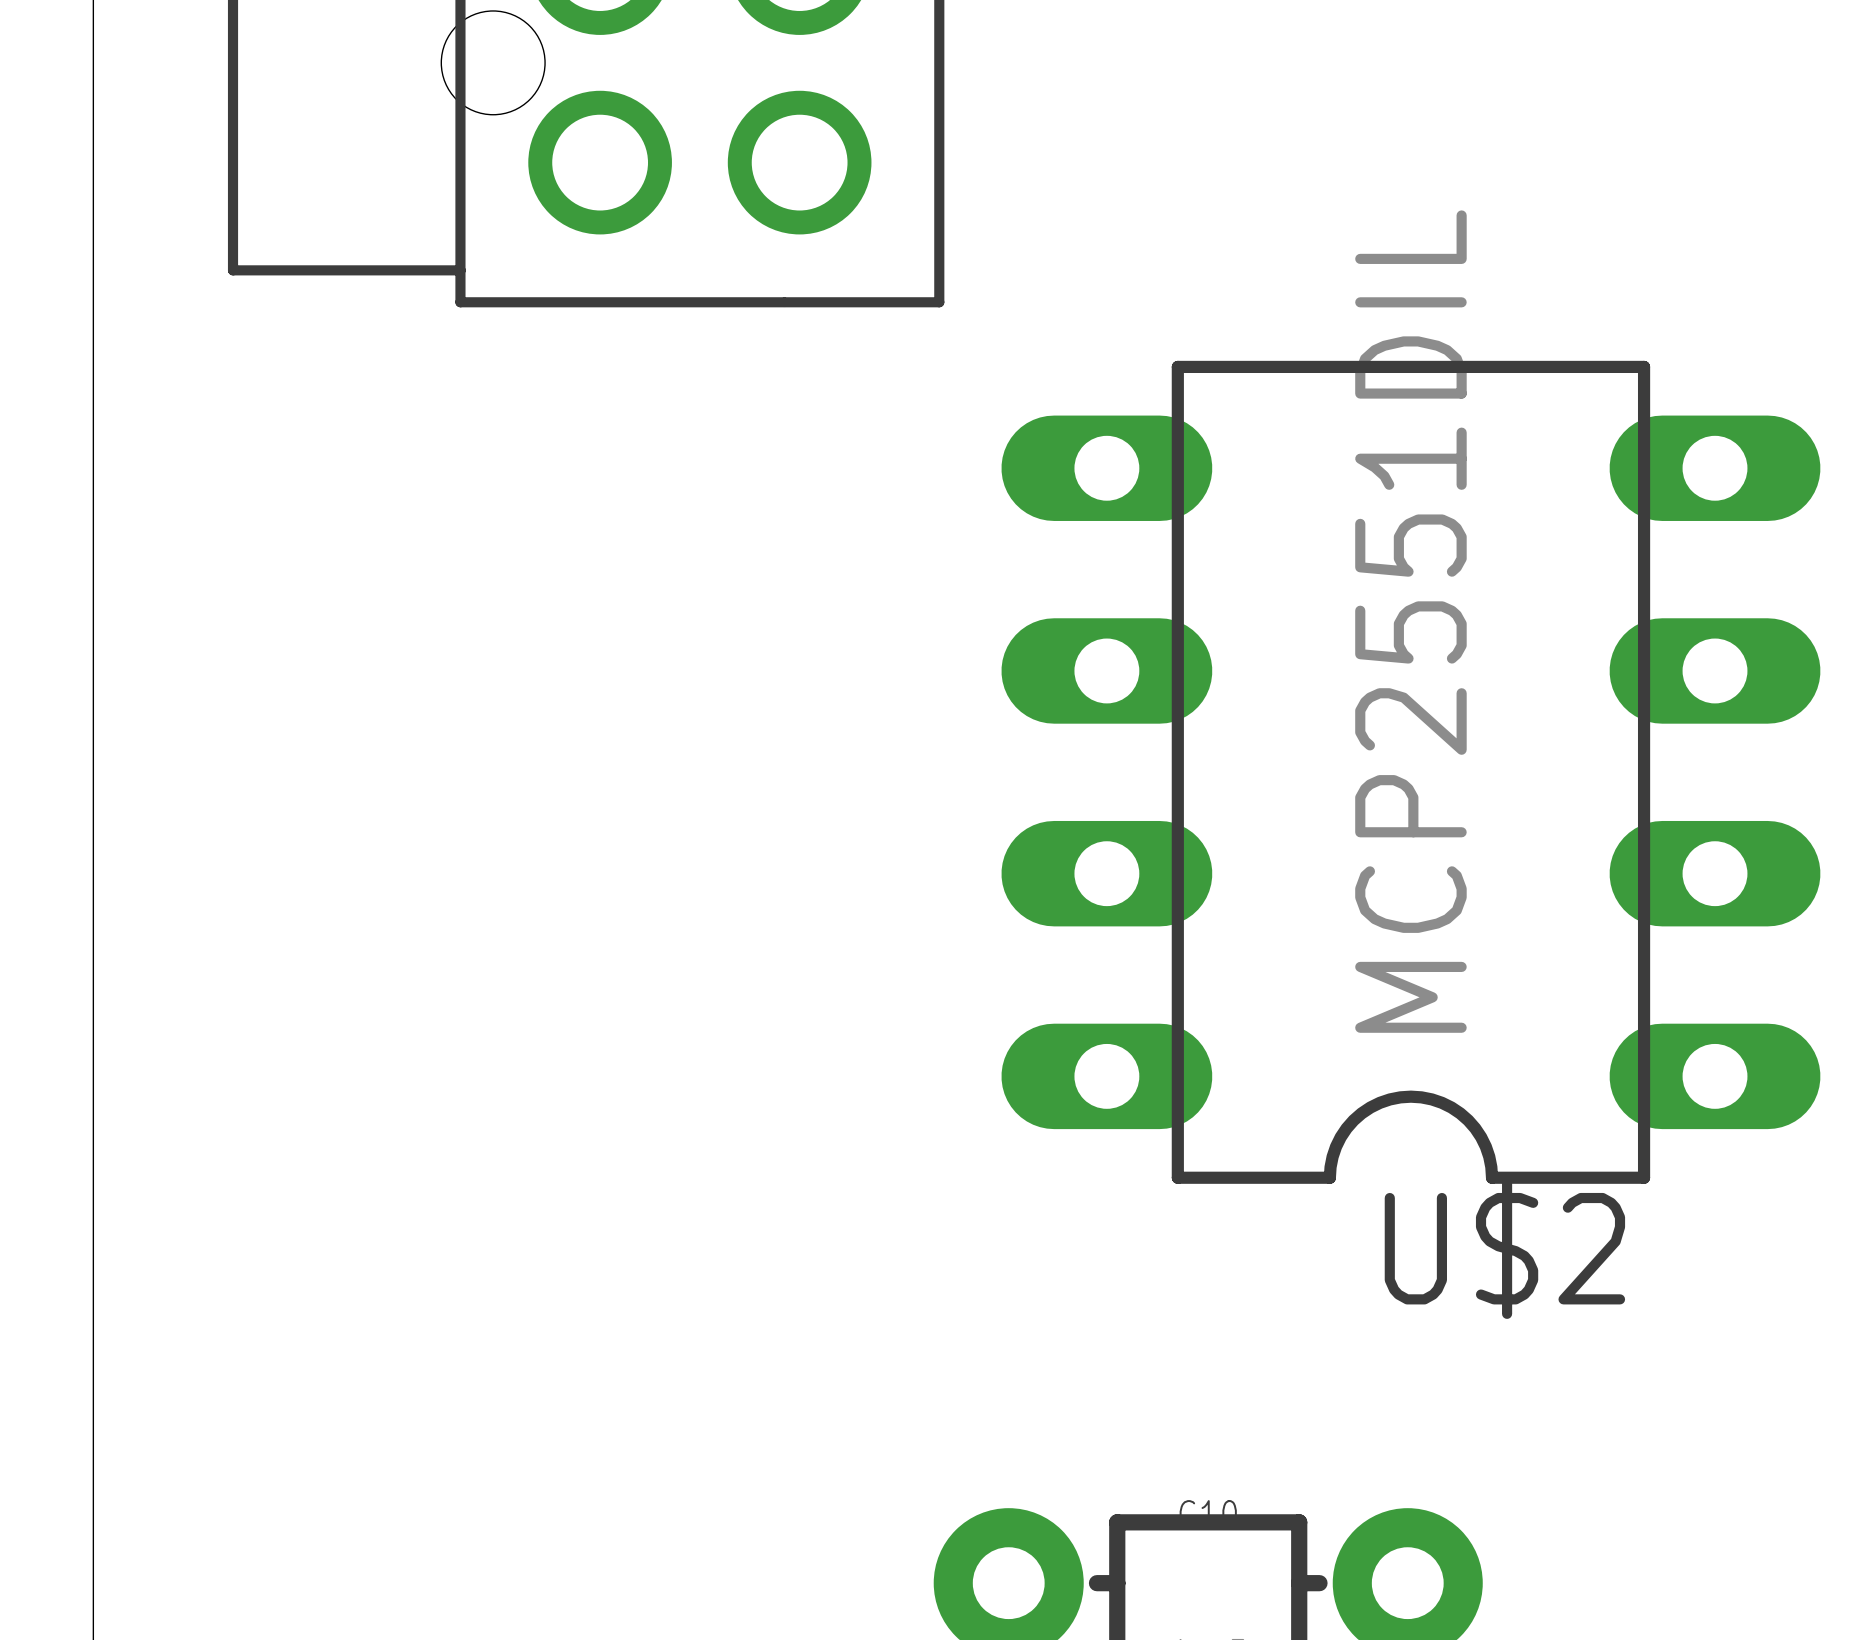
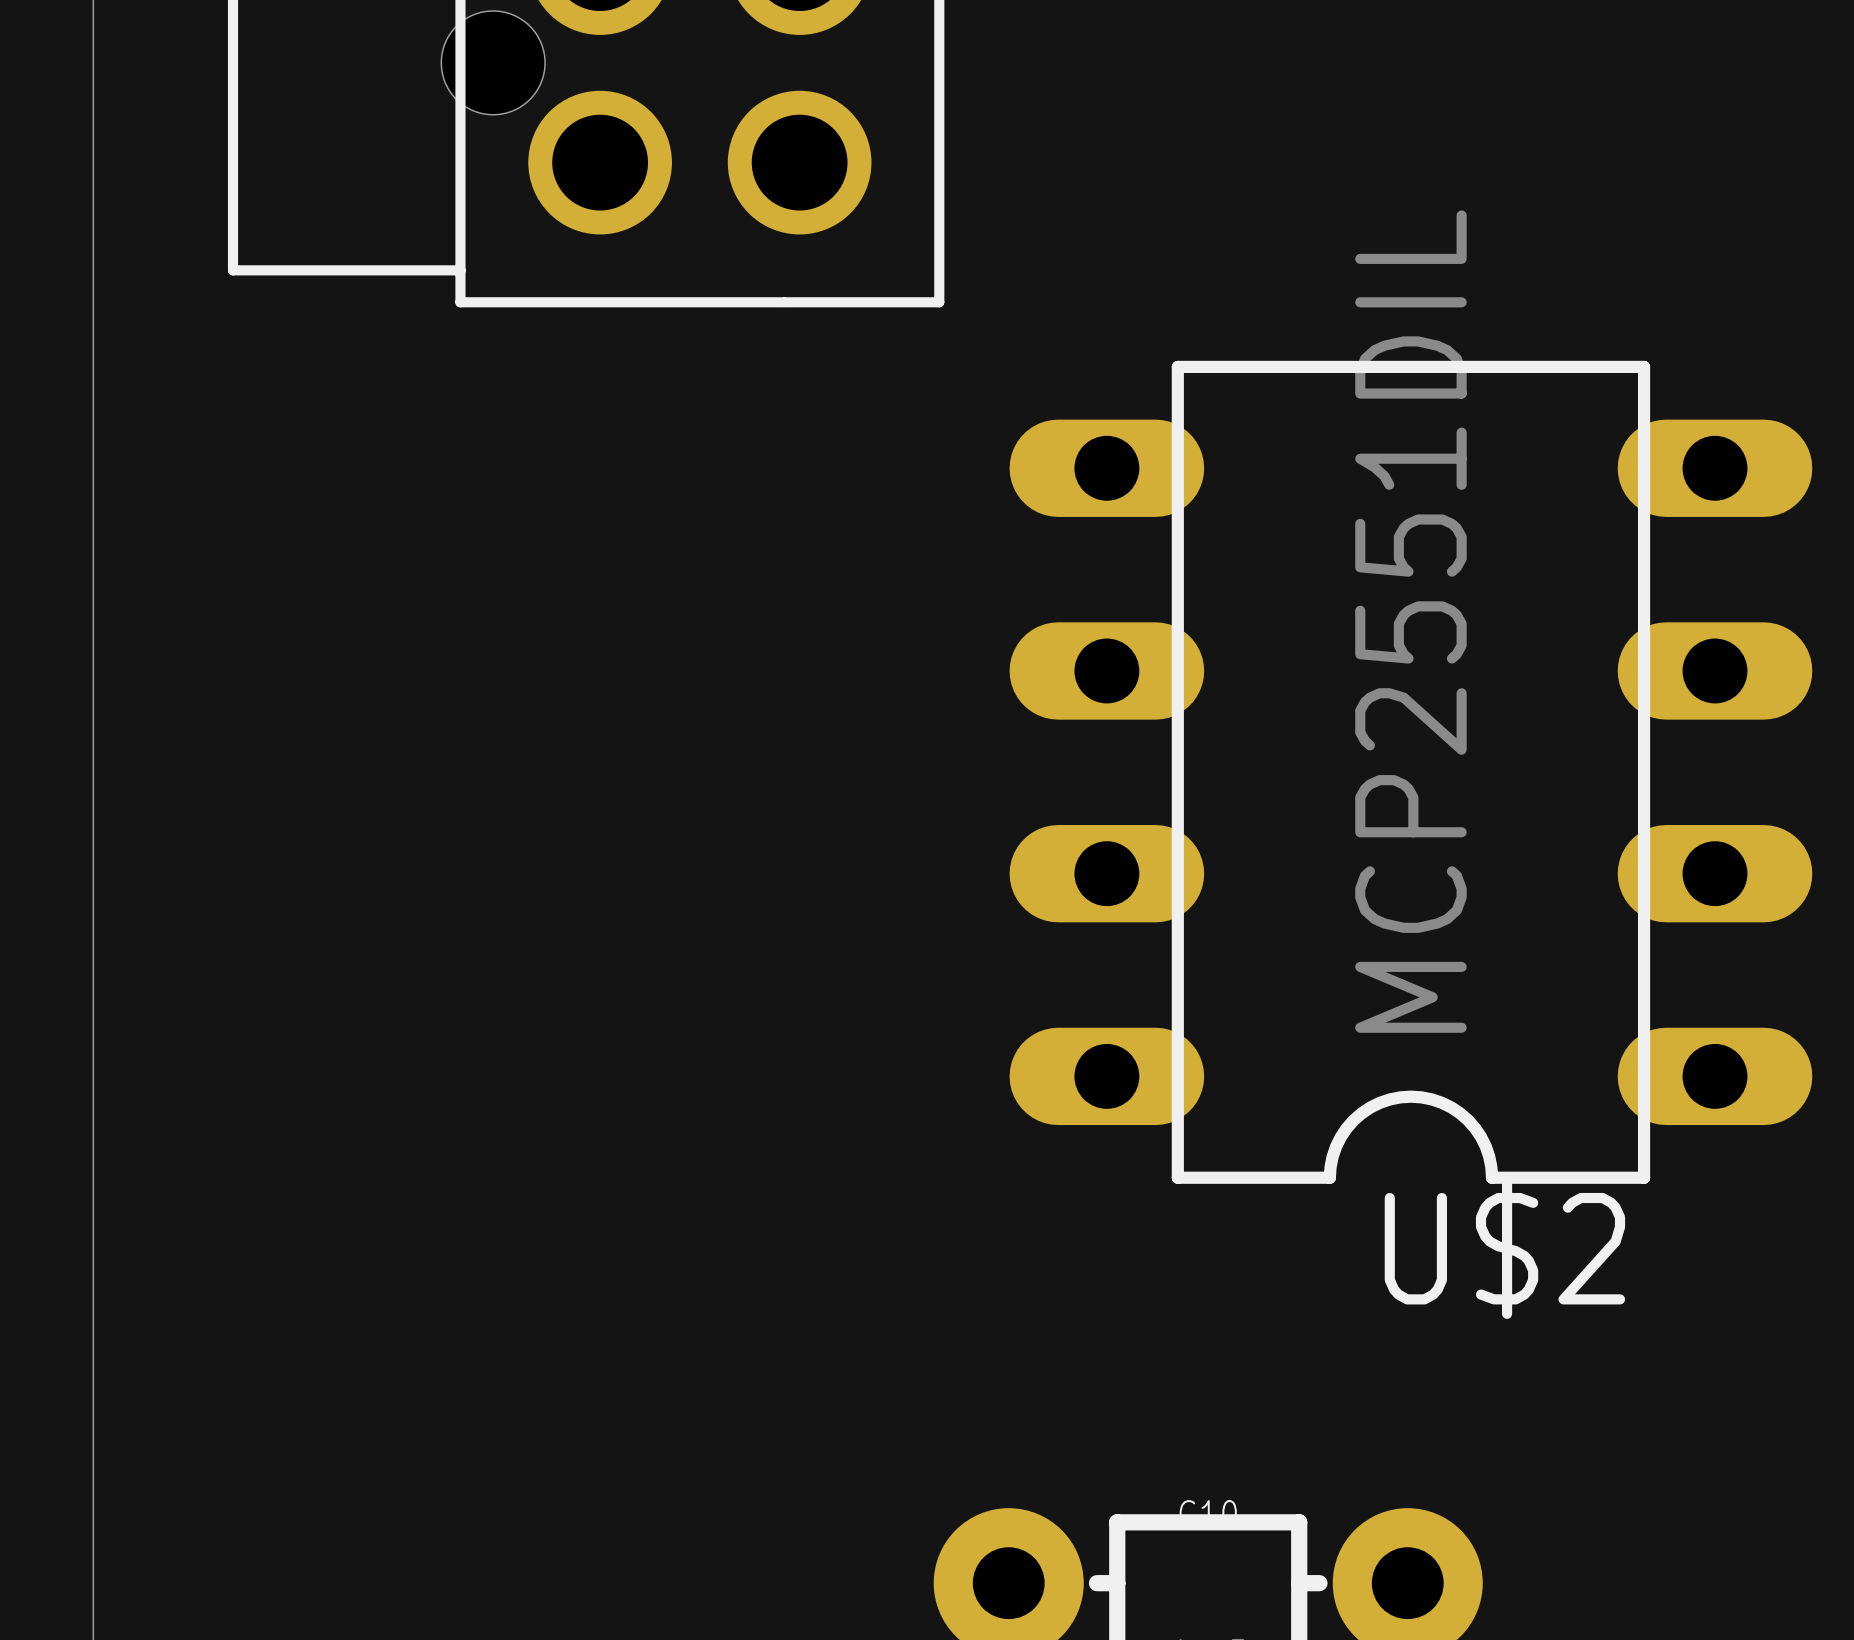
U$2 footprint: [1001, 360, 1821, 1184] -> [1009, 360, 1813, 1184]

